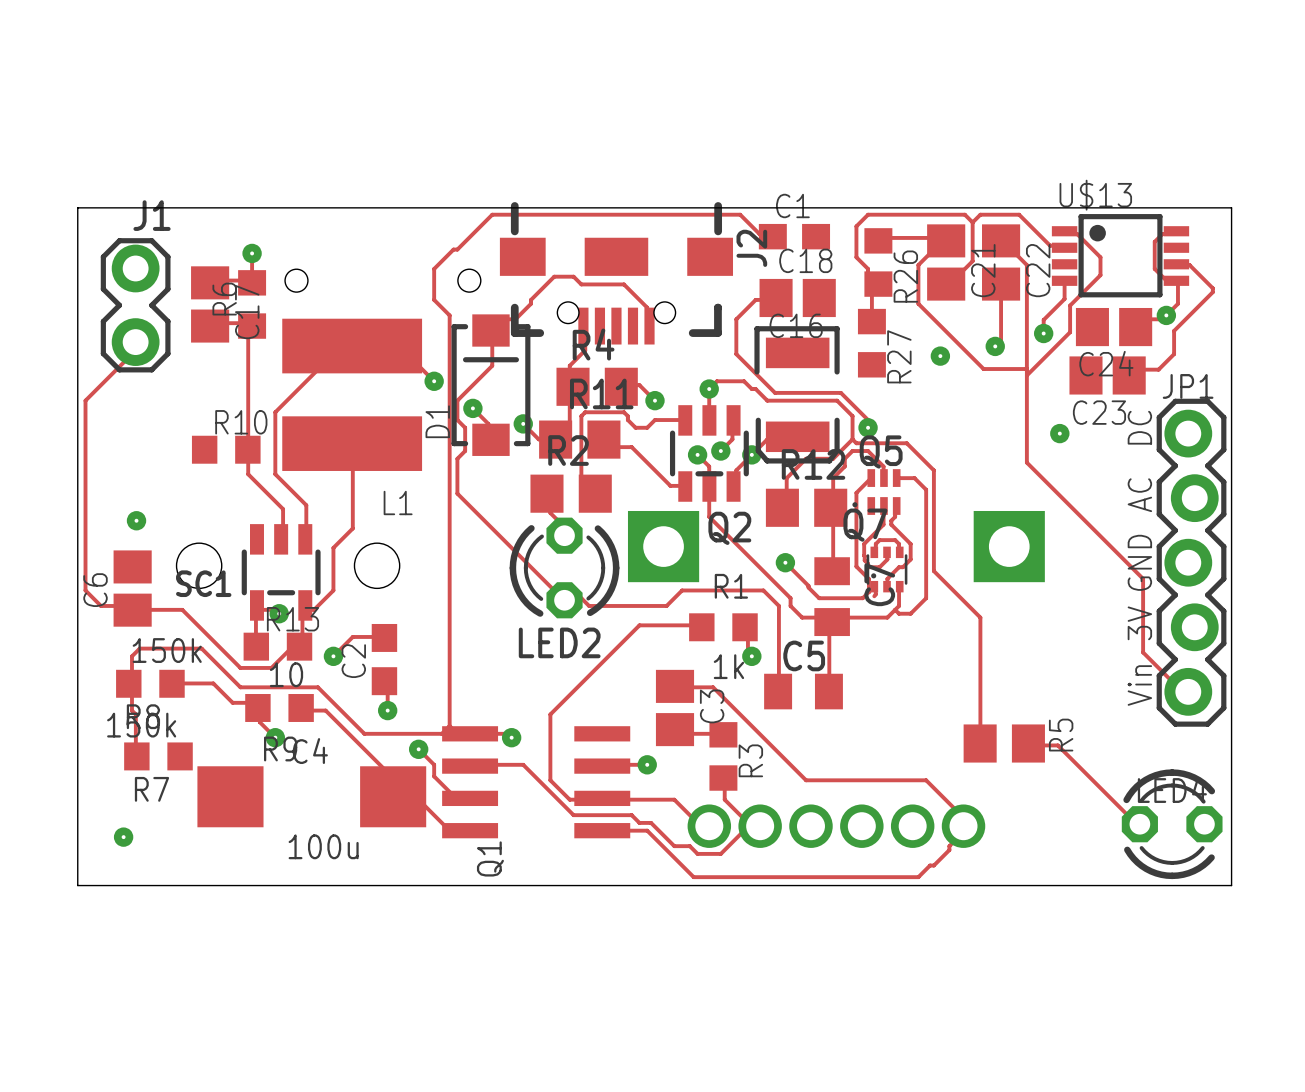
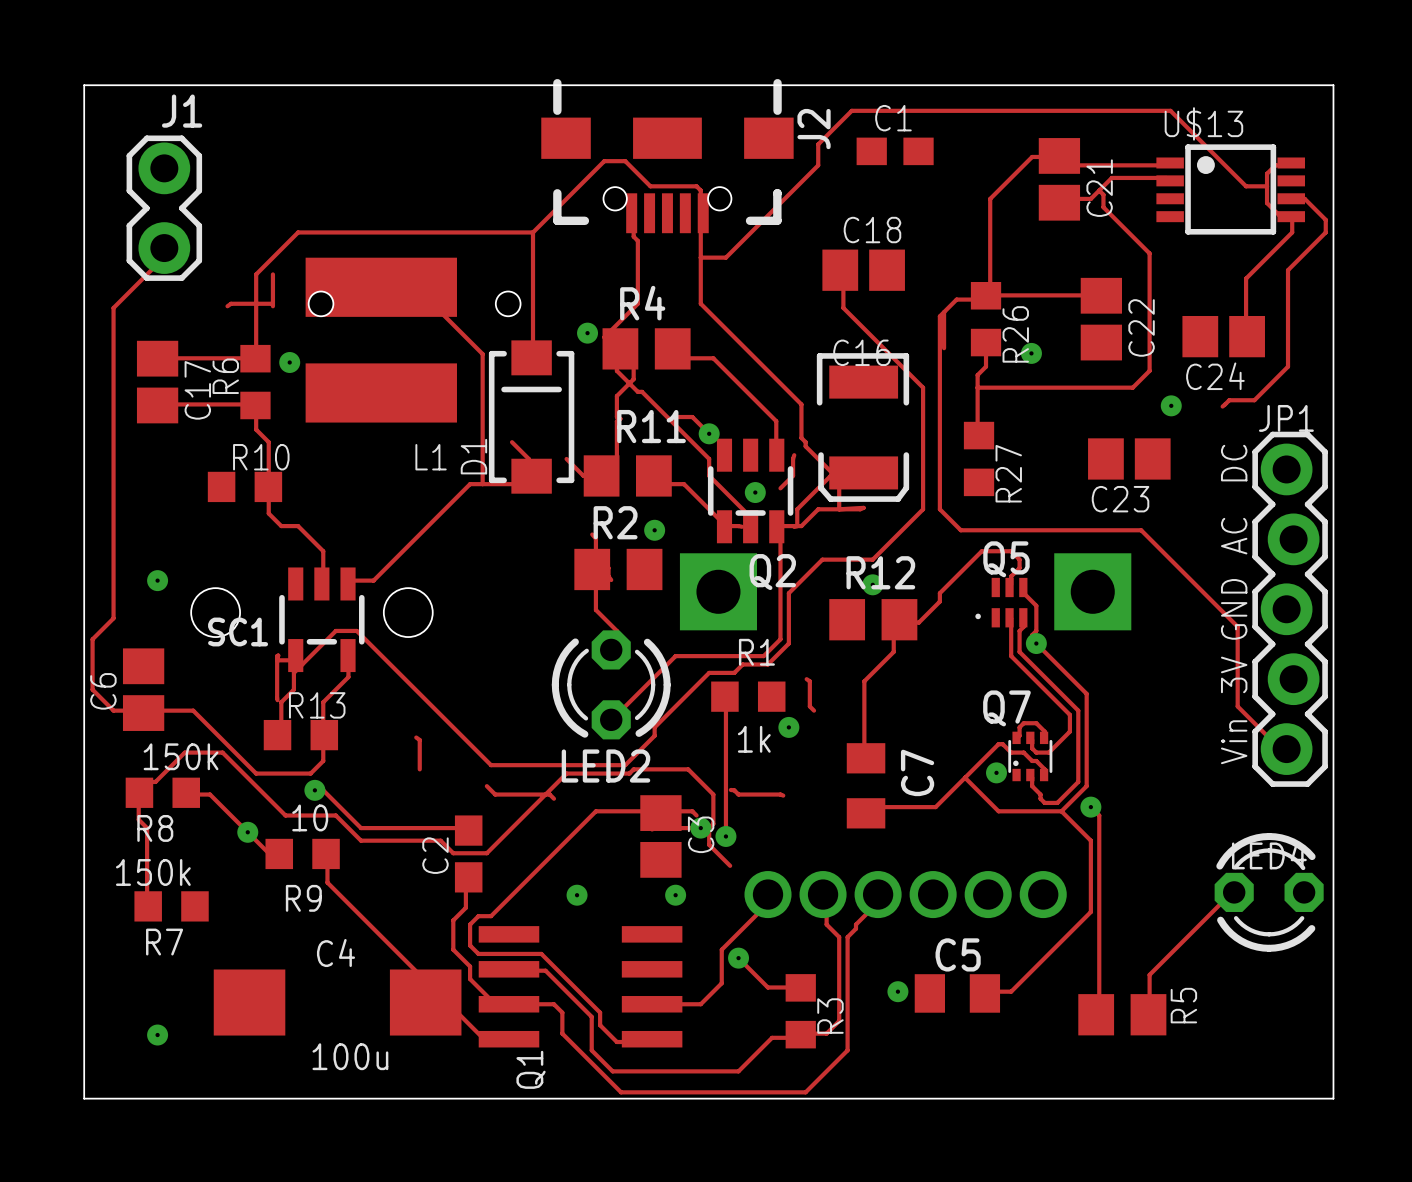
track: none -> (1170, 162) (1166, 165) (1069, 165) (1059, 155) (1032, 156) (990, 198) (990, 295) (986, 295)
track: none -> (1291, 162) (1288, 165) (1275, 165) (1267, 173) (1267, 203) (1279, 215) (1291, 216) (1292, 232) (1246, 278) (1247, 336)
track: none -> (1170, 180) (1166, 177) (1111, 177) (1090, 198) (1061, 198) (1059, 202)
track: none -> (1267, 186) (1246, 186) (1170, 110) (851, 110) (818, 144) (818, 165) (725, 257) (700, 257)
track: none -> (1099, 190) (1103, 194) (1103, 207) (1149, 253) (1149, 370) (1132, 387) (977, 387)
track: none -> (631, 213) (633, 215) (633, 236) (637, 240) (637, 303) (604, 337) (620, 348) (616, 349) (616, 370) (637, 391) (642, 391) (709, 458) (709, 475) (746, 513) (746, 526) (750, 526)
board edge: (77, 207) (1231, 207) -> (84, 225) (84, 85) (1333, 85) (1333, 225)
track: none -> (533, 232) (298, 232) (256, 274) (256, 358) (157, 358)
track: (972, 222) (964, 214) (868, 214) (856, 226) (856, 257) (868, 268) (868, 272) (878, 284) (875, 284) -> (1101, 295) (986, 295) (986, 299) (956, 299) (948, 307)
track: (972, 222) (980, 214) (1019, 214) (1050, 245) (1061, 245) (1064, 247) -> none
track: (972, 222) (972, 261) (949, 284) (946, 284) -> none
track: none -> (164, 248) (163, 257) (113, 307) (113, 618) (92, 639) (92, 689) (113, 710) (142, 710) (143, 713) (147, 710) (193, 710) (256, 773) (310, 773) (323, 760) (323, 702) (348, 677) (348, 655)
track: (1064, 231) (1065, 234) (1077, 234) (1100, 257) (1100, 275) (1070, 305) (1070, 332) (1026, 375) -> none
track: (1176, 231) (1174, 234) (1162, 234) (1154, 241) (1154, 268) (1166, 280) (1176, 280) (1177, 303) (1162, 319) (1146, 319) (1139, 327) (1135, 327) -> none
track: (772, 236) (771, 234) (759, 234) (740, 214) (492, 214) (457, 249) (453, 249) (434, 268) (434, 299) (449, 315) (449, 726) (441, 733) (364, 733) (317, 687) (240, 687) (201, 648) (139, 648) (131, 656) (131, 683) (128, 683) (131, 687) (131, 710) (135, 714) (136, 756) -> none
C1 position: (794, 236) -> (895, 151)
track: (878, 240) (879, 237) (945, 237) (946, 240) (930, 237) (930, 253) (918, 265) (918, 303) (983, 369) (1026, 369) -> none
track: (1001, 240) (1026, 265) (1026, 462) (1054, 489) -> (939, 463) (939, 509) (960, 530) (1141, 530)
via position: (252, 253) -> (289, 362)
U$13 position: (1120, 255) -> (1230, 189)
R26 position: (878, 262) -> (986, 319)
C21 position: (946, 262) -> (1059, 179)
C22 position: (1001, 262) -> (1101, 319)
track: (1176, 264) (1189, 265) (1212, 288) (1212, 292) (1174, 330) (1174, 354) -> (1291, 198) (1304, 198) (1325, 219) (1325, 232) (1288, 270) (1288, 366) (1271, 383)
track: none -> (381, 287) (382, 291) (419, 291) (482, 354) (482, 484)
J2 position: (616, 273) -> (667, 156)
track: (1064, 280) (1064, 299) (1043, 319) (1043, 333) -> none
track: (1001, 284) (1001, 340) (995, 346) -> none
track: (776, 297) (775, 299) (755, 299) (736, 319) (736, 354) (775, 392) (840, 392) (868, 420) -> (944, 312) (939, 316) (939, 454)
C18 position: (797, 297) -> (863, 270)
C17 position: (210, 304) -> (157, 382)
R6 position: (252, 304) -> (255, 382)
J1 position: (135, 305) -> (164, 208)
via: none -> (587, 333)
via: (1166, 315) -> none
track: none -> (986, 342) (986, 366) (977, 375) (979, 435)
track: none -> (672, 348) (684, 358) (713, 358) (776, 421) (776, 455)
track: (210, 326) (213, 323) (252, 323) (252, 327) (248, 330) (248, 408) -> (157, 405) (255, 405) (256, 429) (268, 442)
track: (649, 326) (647, 323) (647, 307) (623, 284) (581, 284) (573, 276) (554, 276) (531, 299) (531, 303) (515, 319) (500, 319) (492, 327) -> (533, 232) (533, 354)
via: none -> (1031, 353)
C24 position: (1114, 327) -> (1223, 336)
track: (490, 330) (492, 365) (457, 400) (457, 420) (465, 427) (465, 451) (457, 458) (457, 493) (564, 600) -> none
via: (1043, 333) -> none
track: (135, 342) (131, 342) (131, 354) (85, 400) (85, 590) (101, 605) (128, 605) (132, 610) (182, 609) (240, 667) (271, 667) (290, 648) (298, 648) (302, 644) (302, 605) (305, 605) (302, 609) (314, 609) (333, 590) (333, 547) (345, 536) -> (348, 583) (348, 580) (373, 580)
R27 position: (871, 343) -> (979, 458)
via: (995, 346) -> none
via: (940, 356) -> none
via: none -> (1171, 405)
C23 position: (1107, 375) -> (1129, 458)
track: (434, 381) (399, 346) (341, 346) (275, 412) (275, 474) (306, 505) (305, 539) -> none
via: (434, 381) -> none
R4 position: (597, 386) -> (646, 348)
via: (709, 389) -> none
L1 position: (352, 394) -> (381, 340)
via: (472, 408) -> none
track: (852, 416) (837, 400) (767, 400) (744, 381) (716, 381) (709, 389) (709, 420) -> (923, 450) (923, 387) (843, 307) (843, 270) (840, 270)
track: (685, 420) (654, 420) (647, 427) (635, 427) (627, 420) (627, 416) (623, 412) (585, 412) (581, 416) (581, 482) (595, 493) -> none
via: (523, 423) -> none
via: (868, 427) -> none
via: (1059, 433) -> none
track: none -> (923, 475) (923, 509) (872, 559) (822, 559) (788, 593) (788, 643) (767, 664) (742, 664) (734, 672) (709, 672) (654, 727) (654, 735) (625, 765) (491, 765) (356, 630) (335, 630) (293, 672)
track: (352, 443) (352, 528) -> (531, 476) (524, 484) (470, 484) (382, 572)
via: (720, 451) -> none
Q2 position: (709, 453) -> (750, 490)
track: (697, 454) (709, 466) (709, 516) (790, 598) (790, 605) (802, 617) (825, 617) (832, 622) -> none
via: (751, 454) -> none
track: (871, 478) (856, 492) (856, 566) (868, 579) (868, 592) -> none
track: (883, 478) (883, 466) (868, 451) (852, 451) (844, 458) (844, 466) (833, 478) (833, 505) (830, 507) (833, 509) (832, 571) -> none
track: (896, 478) (914, 478) (926, 489) (926, 598) (910, 613) (899, 613) (895, 609) -> none
track: (259, 485) (283, 509) (283, 536) (281, 539) -> (281, 526) (298, 526) (323, 551) (321, 583)
via: none -> (654, 530)
Q5 position: (876, 492) -> (1001, 602)
R2 position: (571, 493) -> (618, 569)
track: (883, 506) (883, 524) (864, 543) (864, 560) (868, 563) (868, 567) (879, 567) (887, 559) (887, 552) -> none
track: (896, 506) (895, 516) (891, 520) (891, 524) (910, 543) (910, 559) (887, 578) (887, 586) -> none
track: (782, 507) (786, 501) (786, 478) (806, 458) (833, 458) (852, 439) (856, 443) (906, 443) (933, 470) (933, 532) -> (866, 758) (864, 756) (864, 681) (893, 651) (893, 626) (899, 619) (902, 622) (918, 622) (939, 601) (939, 593) (981, 551) (1011, 551) (1019, 559) (1019, 568) (1011, 576)
R12 position: (806, 507) -> (873, 619)
via position: (136, 520) -> (157, 580)
track: none -> (592, 569) (595, 572) (595, 609) (616, 630) (616, 643) (612, 647)
track: (933, 540) (933, 571) (953, 590) -> (1023, 587) (1023, 593) (1036, 605) (1036, 630) (1032, 635) (1032, 639)
track: (874, 552) (875, 543) (879, 540) (895, 540) (899, 543) (899, 552) -> none
track: (785, 562) (819, 598) (862, 598) (874, 586) (874, 596) -> none
via position: (785, 562) -> (872, 584)
LED2 position: (564, 567) -> (611, 684)
Q7 position: (887, 569) -> (1030, 756)
track: none -> (1009, 617) (1011, 618) (1011, 656) (1069, 714) (1069, 731) (1048, 752) (1036, 752) (1032, 748) (1030, 737)
track: none -> (1023, 617) (1023, 626) (1019, 630) (1019, 651) (1078, 710) (1078, 781) (1057, 802) (1044, 802) (1040, 798) (1040, 794) (1032, 786) (1030, 775)
SC1 position: (281, 572) -> (321, 619)
track: (899, 586) (899, 605) (887, 617) (837, 617) (832, 622) -> none
C6 position: (132, 588) -> (143, 689)
via: none -> (1036, 643)
C7 position: (832, 596) -> (866, 785)
track: (565, 598) (581, 598) (589, 605) (623, 605) -> (611, 719) (675, 656)
track: none -> (295, 655) (293, 656) (293, 689) (281, 702) (281, 731) (277, 735)
track: (666, 605) (682, 590) (763, 590) (778, 605) (778, 691) -> (721, 656) (763, 656) (780, 639) (780, 530) (776, 526) (801, 526) (818, 509) (860, 509) (863, 507) (839, 509) (839, 479) (805, 446) (805, 442) (801, 438) (801, 404) (700, 303) (700, 215) (703, 213) (700, 211) (700, 190) (696, 186) (650, 186) (625, 161) (604, 161) (533, 232)
via: (279, 613) -> none
track: (980, 617) (980, 743) -> (1061, 668) (1086, 693) (1086, 786) (1061, 811)
track: (832, 622) (829, 625) (829, 691) -> none
track: (701, 627) (701, 625) (639, 625) (550, 714) (550, 780) (569, 799) (674, 799) (697, 822) (709, 822) (709, 826) -> (652, 1004) (700, 1004) (721, 983) (721, 949) (767, 903) (768, 894)
R1 position: (723, 627) -> (748, 696)
track: (384, 637) (352, 636) (333, 656) -> none
track: none -> (724, 696) (725, 836)
R13 position: (277, 646) -> (300, 735)
via: (333, 656) -> none
via position: (751, 656) -> (788, 727)
C2 position: (384, 659) -> (468, 853)
track: none -> (1016, 737) (1019, 735) (1019, 727) (1023, 723) (1036, 723) (1044, 731) (1044, 737)
R8 position: (150, 683) -> (162, 792)
track: (172, 683) (213, 683) (232, 702) (252, 702) (259, 710) (259, 722) (275, 737) -> none
track: (675, 686) (713, 687) (806, 780) (926, 780) (961, 815) (961, 822) (963, 826) (961, 826) (961, 834) (949, 846) (949, 850) (918, 877) (693, 877) (647, 830) (602, 830) -> none
C5 position: (803, 691) -> (957, 993)
R9 position: (279, 707) -> (302, 853)
track: (301, 707) (302, 710) (325, 710) (391, 776) (391, 795) (395, 799) (418, 799) (449, 830) (470, 830) -> none
C3 position: (675, 707) -> (660, 836)
via: (387, 710) -> none
via: none -> (996, 772)
track: none -> (1044, 775) (1044, 769) (1036, 760) (1032, 760) (1023, 752) (1011, 752) (1002, 744) (998, 744) (935, 807) (872, 807) (866, 813)
track: none -> (965, 777) (998, 811) (1061, 811)
track: none -> (314, 790) (323, 790) (361, 828) (465, 828) (468, 830)
track: none -> (186, 792) (189, 794) (210, 794) (268, 853) (279, 853)
via position: (275, 737) -> (314, 790)
via: (511, 737) -> none
R5 position: (1004, 743) -> (1122, 1014)
track: (1028, 743) (1030, 745) (1057, 745) (1139, 826) (1139, 824) -> (1148, 1014) (1149, 974) (1233, 891) (1234, 892)
track: none -> (1090, 807) (1099, 815) (1099, 1012) (1096, 1014)
via: none -> (1090, 807)
track: (418, 749) (434, 764) (434, 776) (453, 795) (469, 795) (470, 798) -> none
via: (418, 749) -> none
track: none -> (1061, 811) (1090, 840) (1090, 911) (1011, 991) (986, 991) (984, 993)
track: none -> (696, 815) (692, 811) (663, 811) (660, 813) (658, 811) (595, 811) (491, 916) (478, 916) (470, 924) (470, 945) (478, 953) (541, 953) (600, 1012) (600, 1025) (616, 1042) (650, 1042) (652, 1039)
R7 position: (158, 756) -> (171, 906)
R3 position: (723, 756) -> (800, 1011)
track: (470, 766) (523, 764) (573, 815) (631, 815) (639, 822) (651, 822) (674, 846) (689, 846) (697, 853) (720, 853) (751, 822) (760, 826) (759, 822) (747, 822) (724, 799) (723, 778) -> none
via: none -> (247, 832)
via: none -> (725, 836)
Q1 position: (536, 782) -> (580, 986)
track: none -> (326, 853) (327, 882) (423, 979) (423, 1000) (425, 1002) (428, 1004) (449, 1004) (482, 1037) (508, 1039)
C4 position: (311, 796) -> (337, 1002)
track: none -> (730, 865) (709, 844) (709, 828) (713, 823) (713, 794) (688, 769) (633, 769) (629, 773) (566, 773) (486, 853) (453, 853) (440, 840) (361, 840) (335, 815) (285, 815) (222, 752) (184, 752) (155, 781) (151, 781) (138, 794) (138, 819) (147, 828) (148, 906)
track: none -> (468, 877) (465, 878) (465, 907) (453, 920) (453, 949) (470, 966) (470, 979) (495, 1004) (553, 1004) (562, 1012) (562, 1033) (621, 1092) (805, 1092) (847, 1050) (847, 937) (855, 928) (855, 924) (876, 903) (878, 894)
via: none -> (577, 895)
via: none -> (675, 895)
track: none -> (823, 894) (826, 895) (826, 924) (839, 937) (839, 1021) (826, 1033) (801, 1033) (797, 1037) (772, 1037) (738, 1071) (612, 1071) (591, 1050) (591, 1016) (545, 970) (508, 969)
via: (123, 837) -> none
track: none -> (738, 958) (767, 987) (800, 987)
via: none -> (738, 958)
board edge: (77, 885) (1231, 885) -> (84, 958) (84, 1098) (1333, 1098) (1333, 958)
via: none -> (897, 991)
via: none -> (157, 1035)

